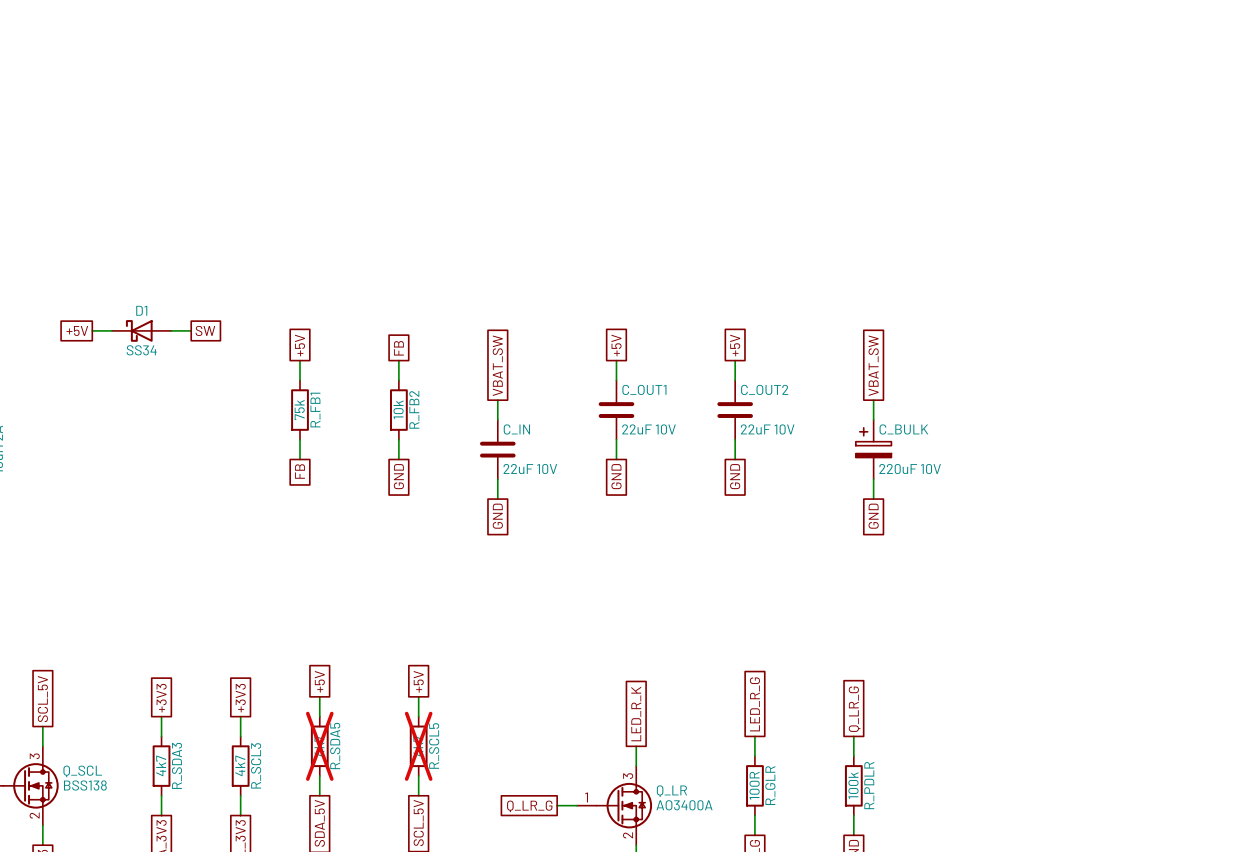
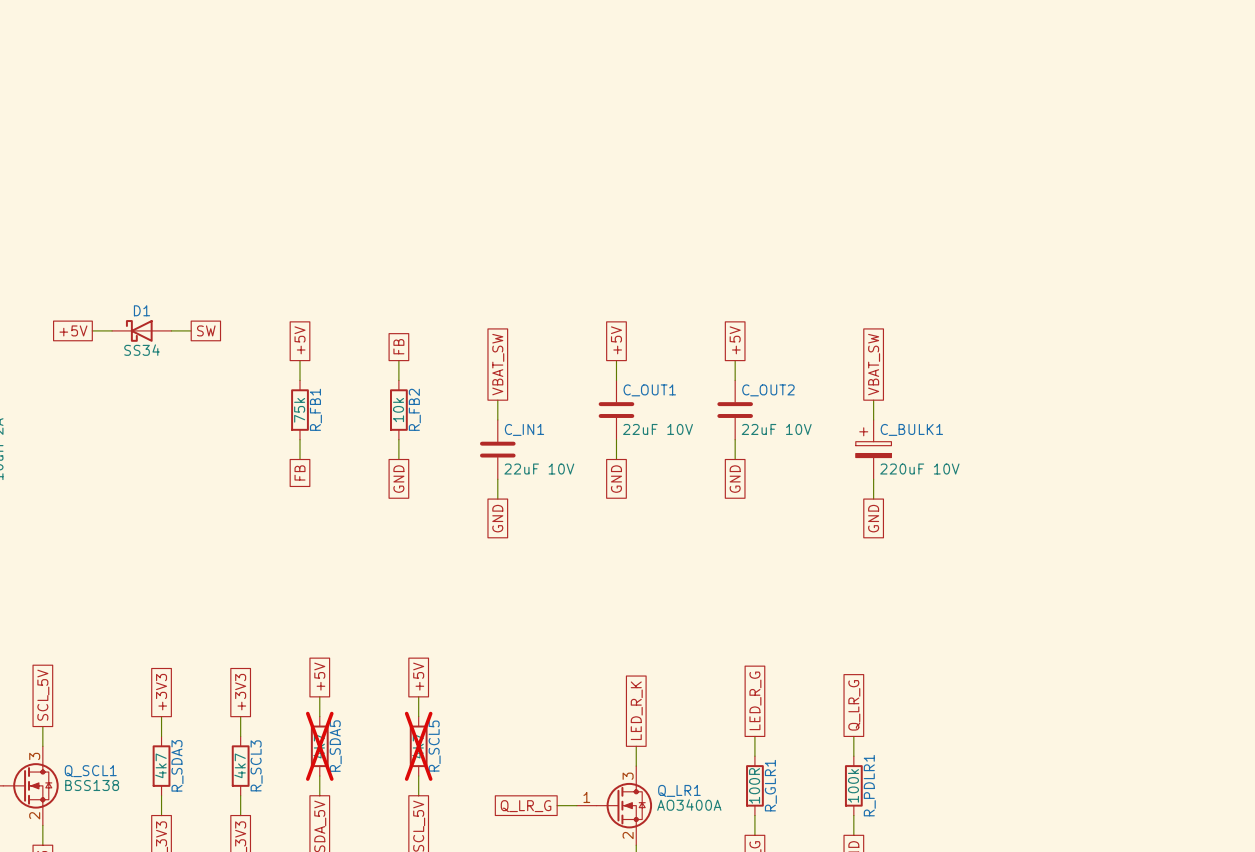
C_IN name: C_IN (516, 429) -> C_IN1 (524, 429)
C_BULK name: C_BULK (903, 429) -> C_BULK1 (911, 429)
Q_SCL name: Q_SCL (82, 771) -> Q_SCL1 (90, 771)
R_GLR name: R_GLR (770, 785) -> R_GLR1 (770, 785)
R_PDLR name: R_PDLR (869, 785) -> R_PDLR1 (869, 785)
Q_LR name: Q_LR (671, 791) -> Q_LR1 (679, 790)

